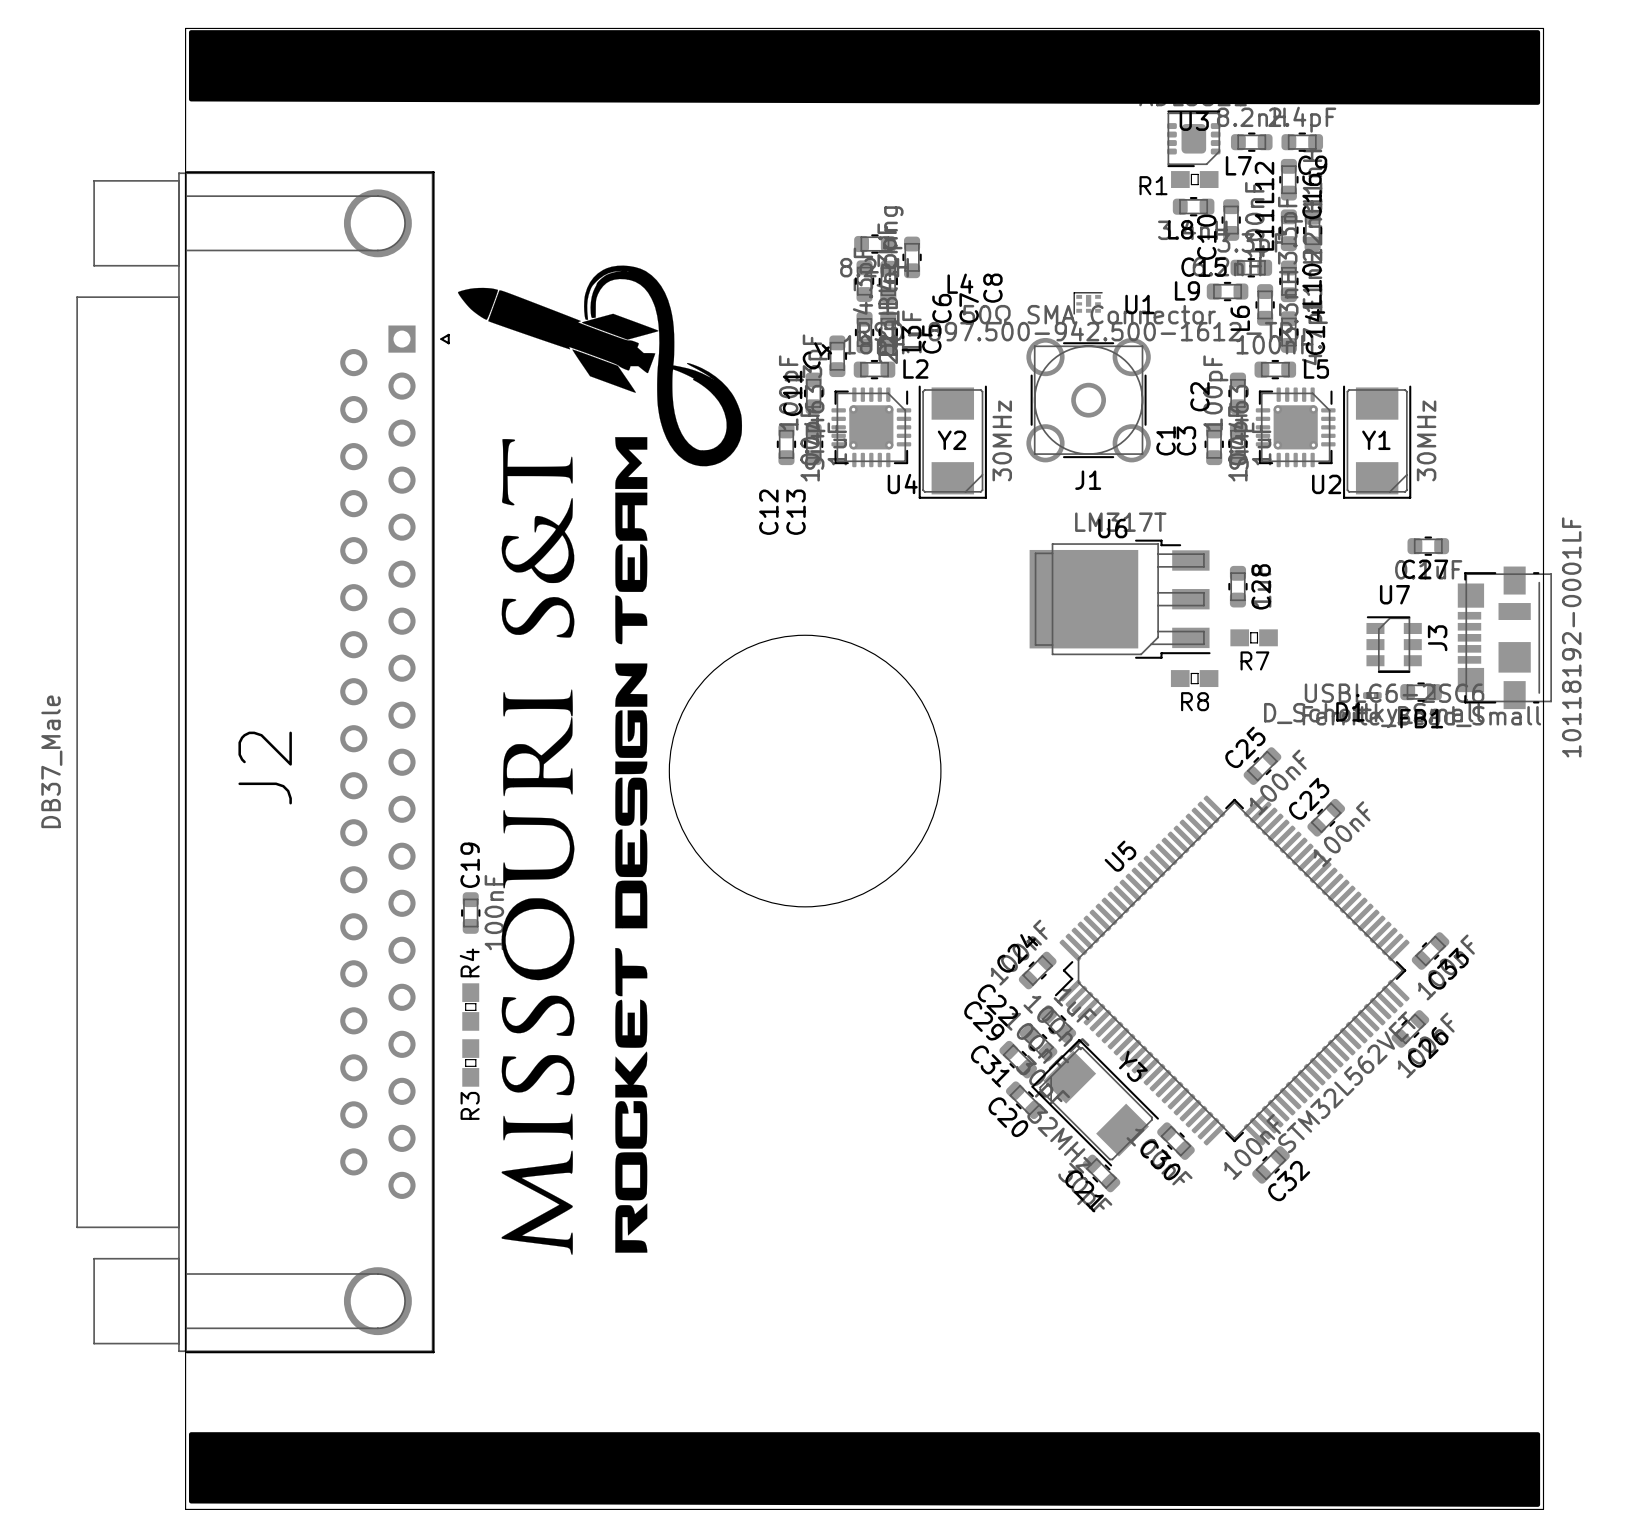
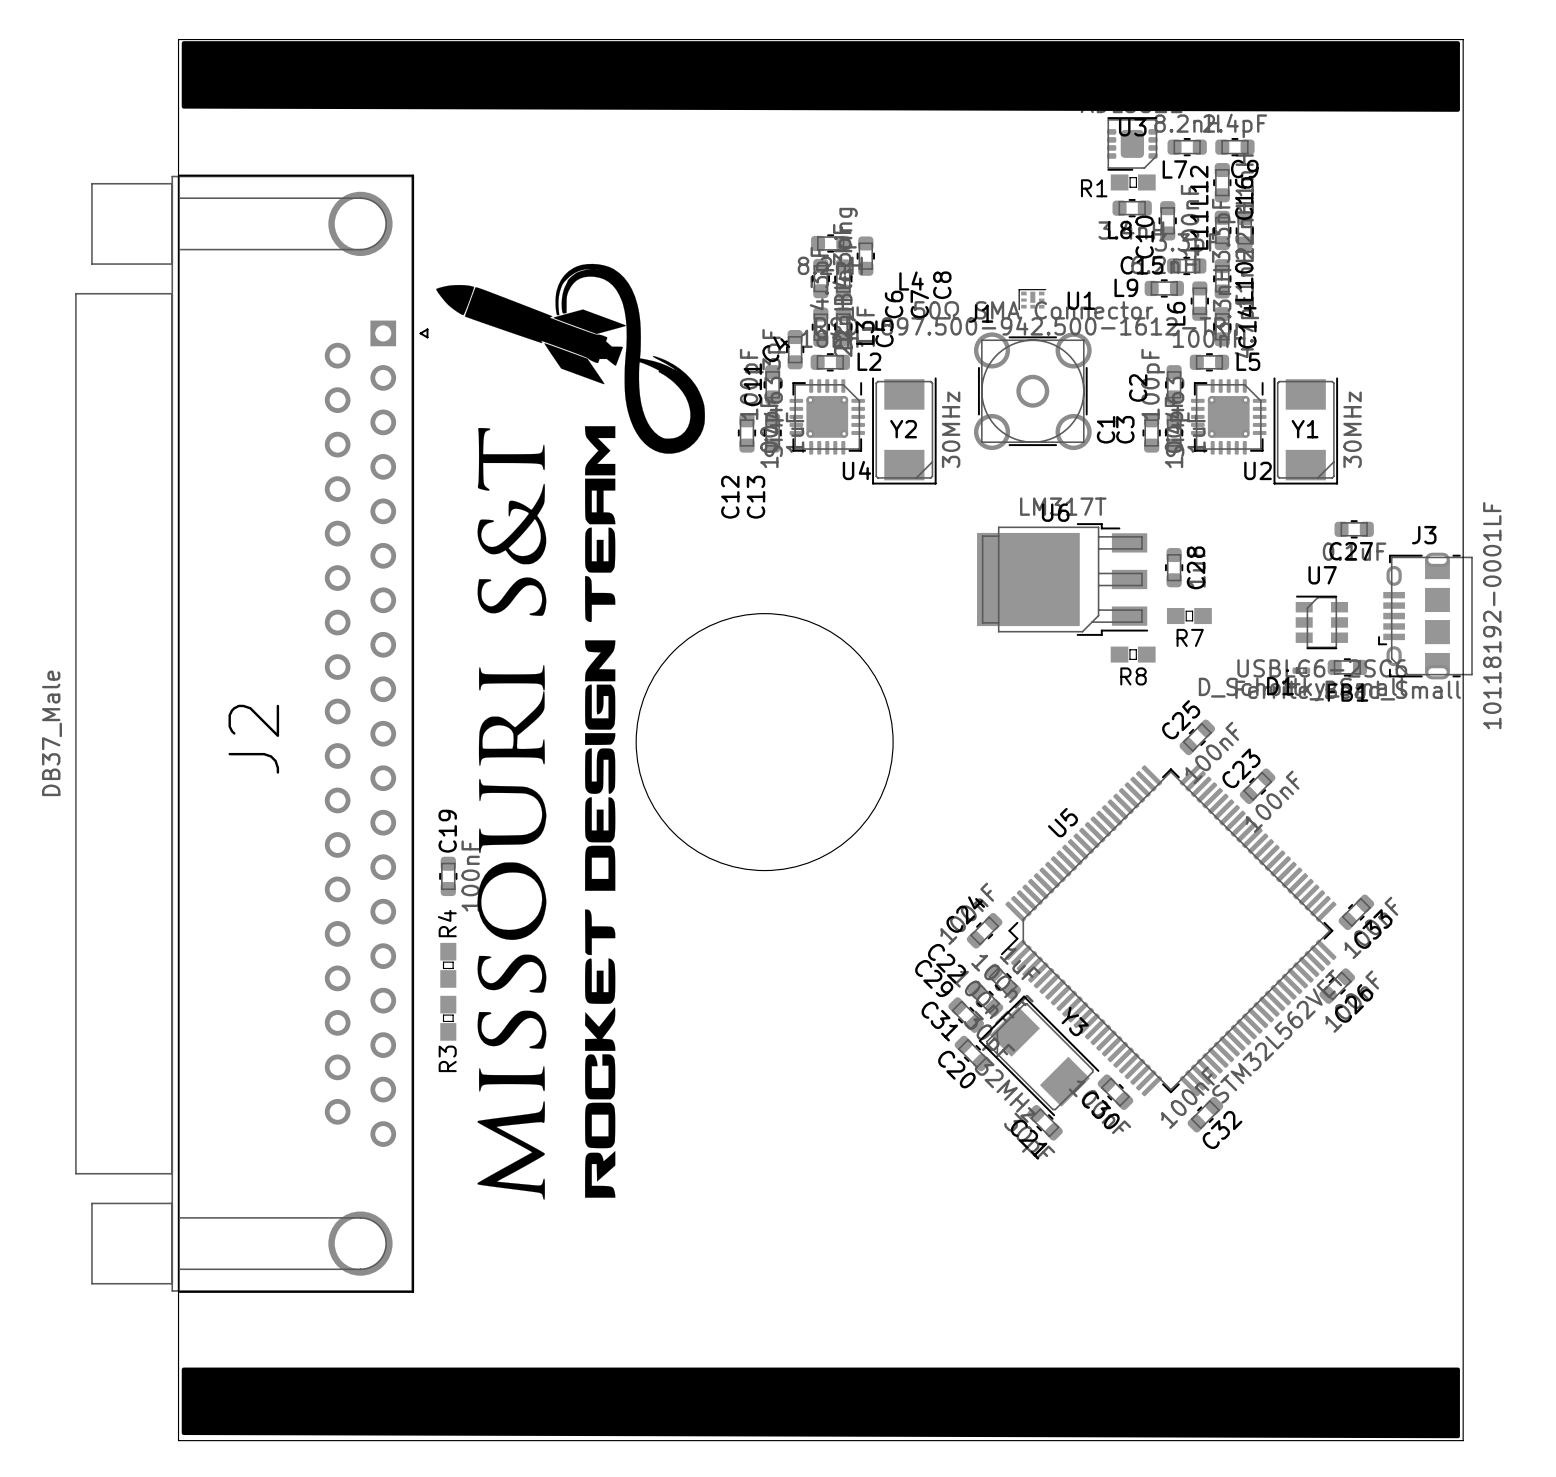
J1 name position: J1 (1088, 480) -> J1 (981, 313)
J3 footprint: [1457, 566, 1552, 710] -> [1378, 552, 1473, 680]
J3 name position: J3 (1437, 638) -> J3 (1424, 535)

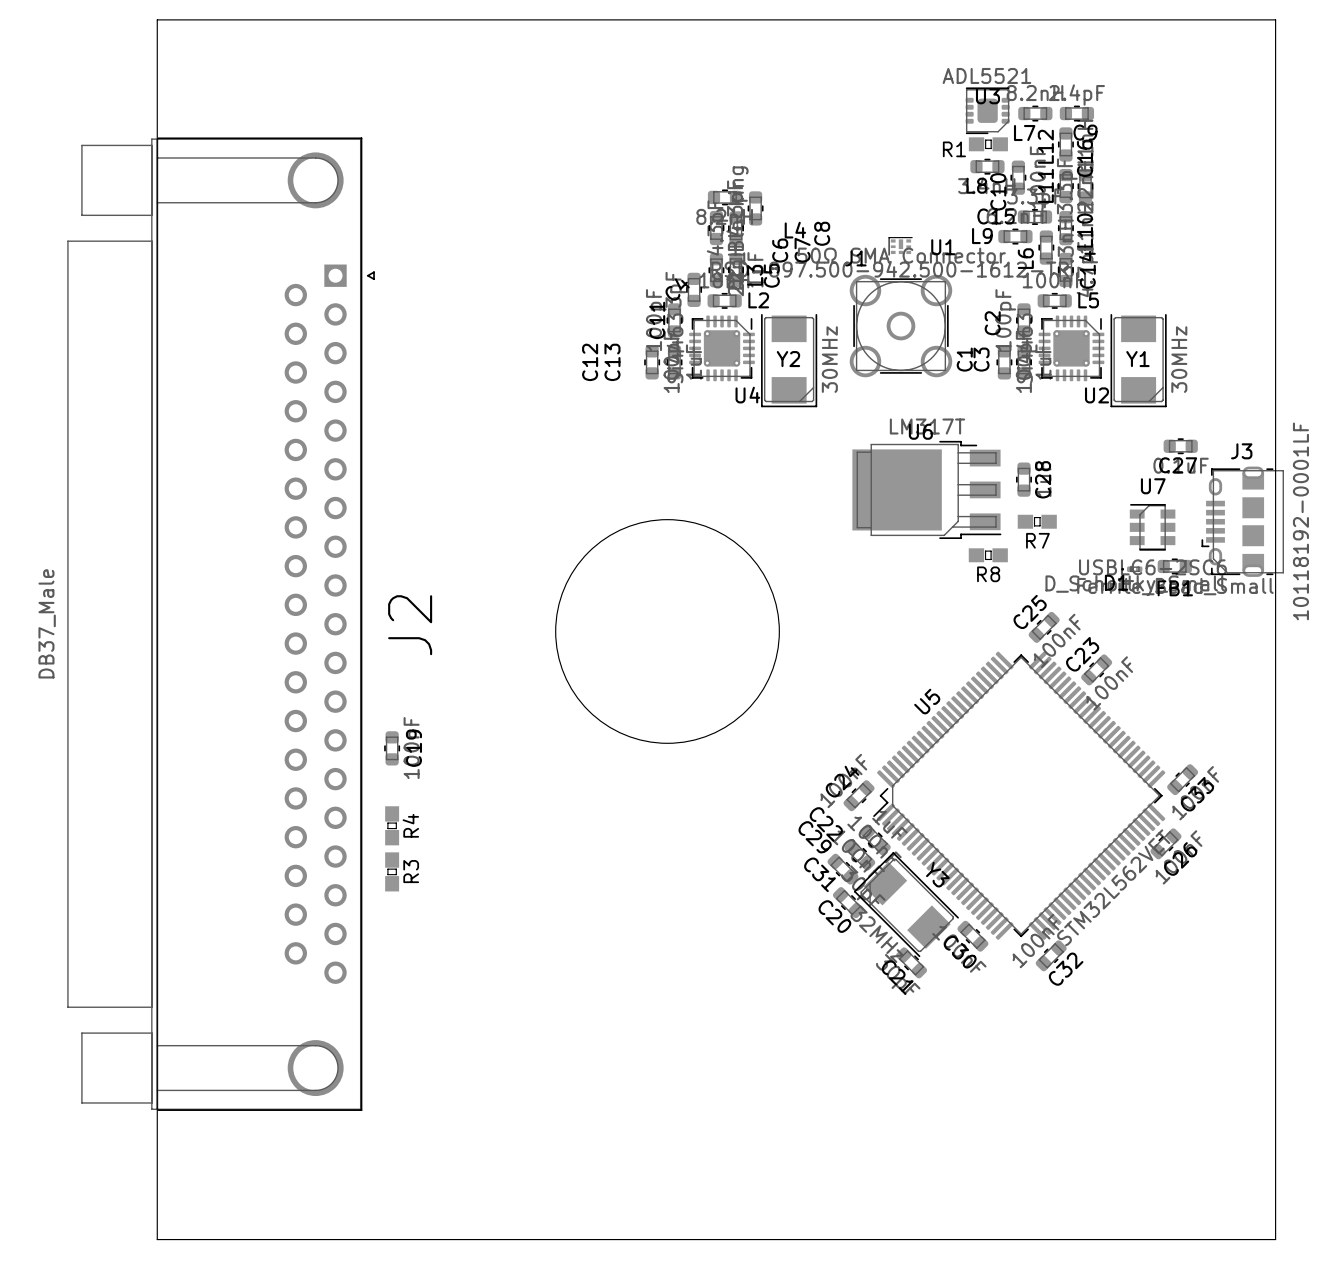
drawing: [181, 41, 1460, 112] -> none
drawing: [436, 263, 705, 1200] -> none
C12 name position: C12 (730, 497) -> C12 (590, 362)
C13 name position: C13 (756, 497) -> C13 (612, 362)
J2 name position: J2 (253, 739) -> J2 (410, 625)
C19 name position: C19 (447, 831) -> C19 (413, 748)
R4 name position: R4 (447, 923) -> R4 (410, 825)
R3 name position: R3 (447, 1058) -> R3 (411, 871)
drawing: [181, 1367, 1460, 1439] -> none

